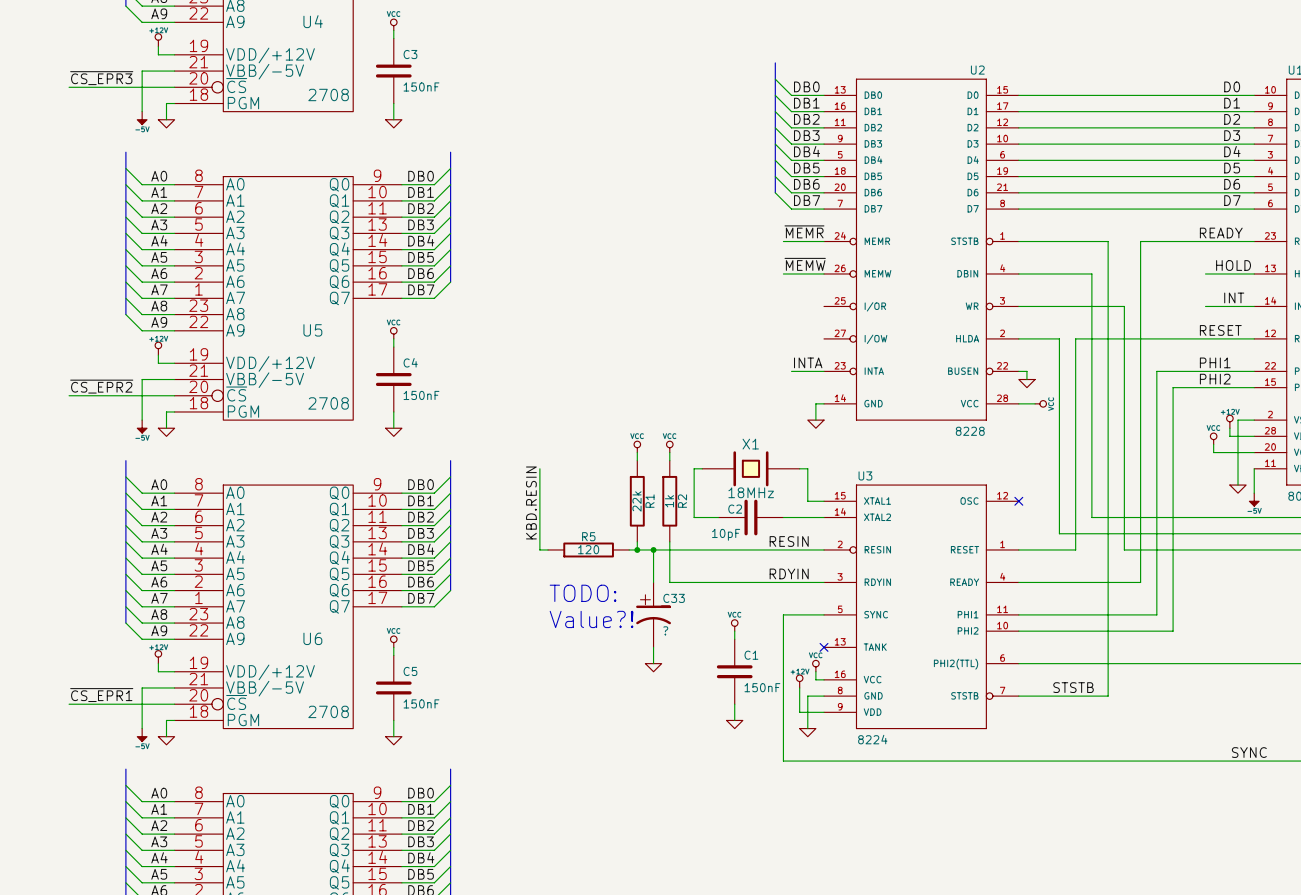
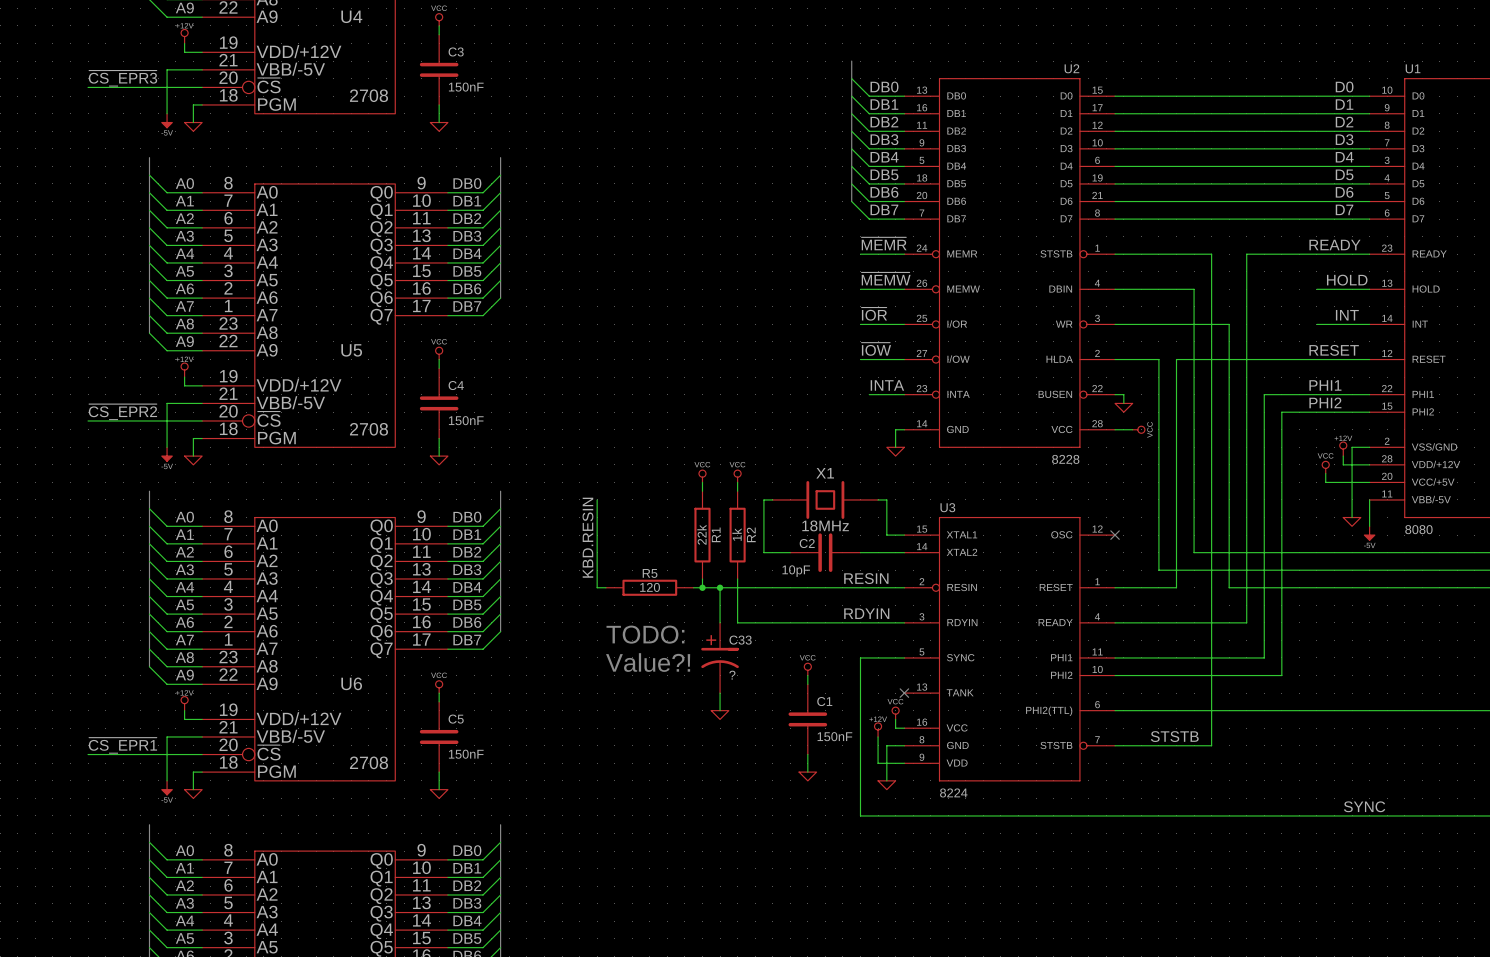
label: none -> ~{IOR} (874, 314)
wire: none -> (860, 324) (904, 324)
label: none -> ~{IOW} (876, 349)
wire: none -> (860, 359) (904, 359)

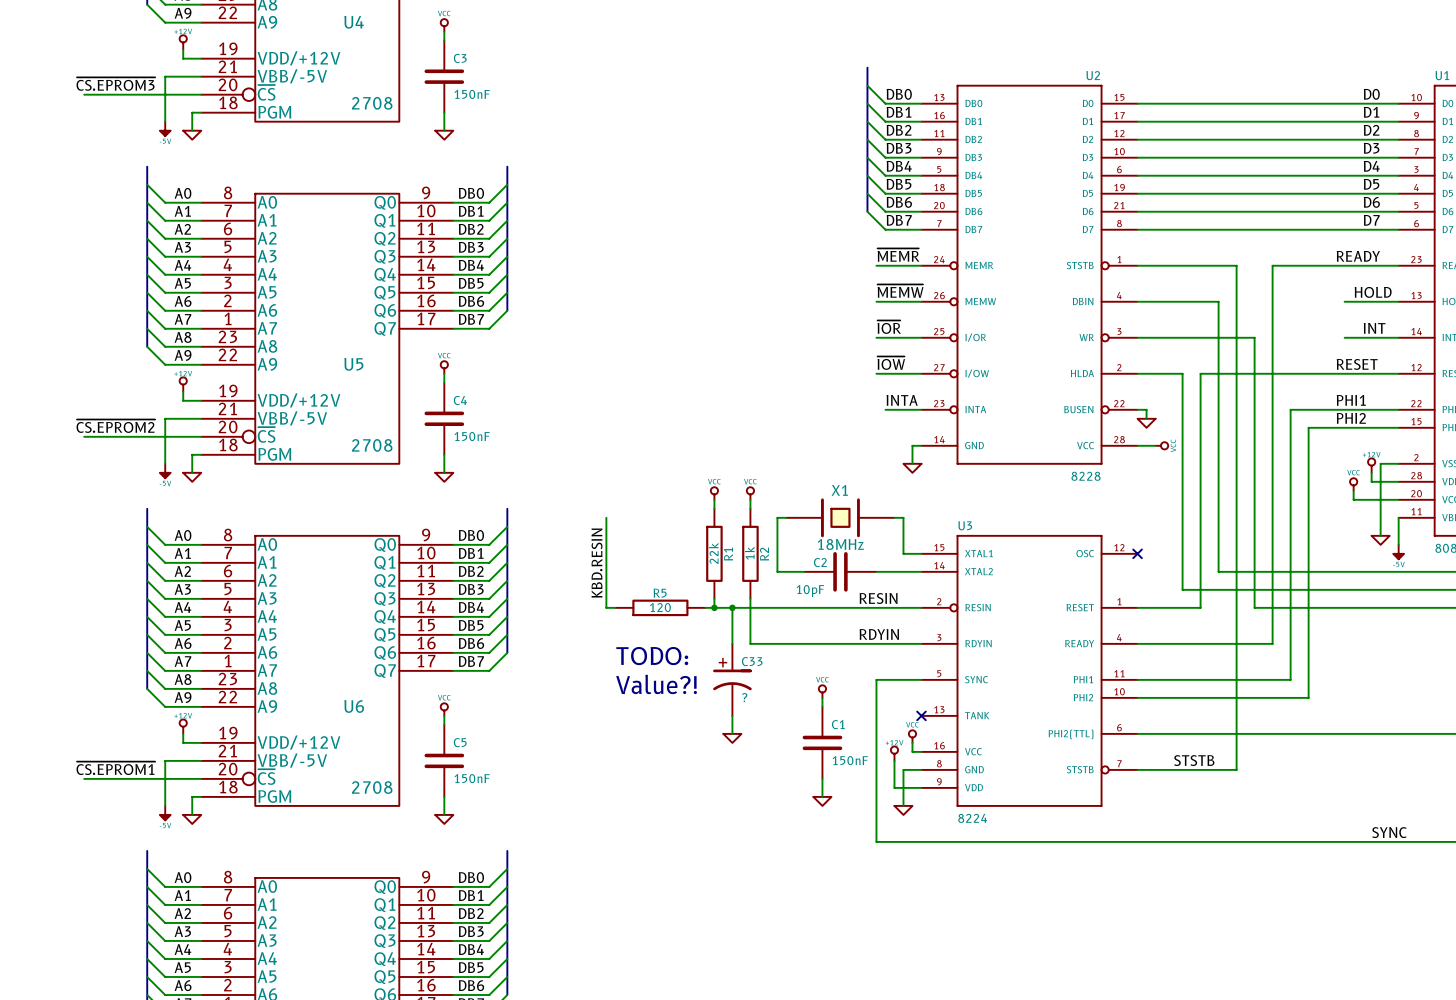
label: ~{CS_EPR3} (122, 78) -> ~{CS.EPROM3} (115, 84)
label: ~{CS_EPR2} (122, 412) -> ~{CS.EPROM2} (115, 426)
label: ~{CS_EPR1} (122, 745) -> ~{CS.EPROM1} (115, 768)

